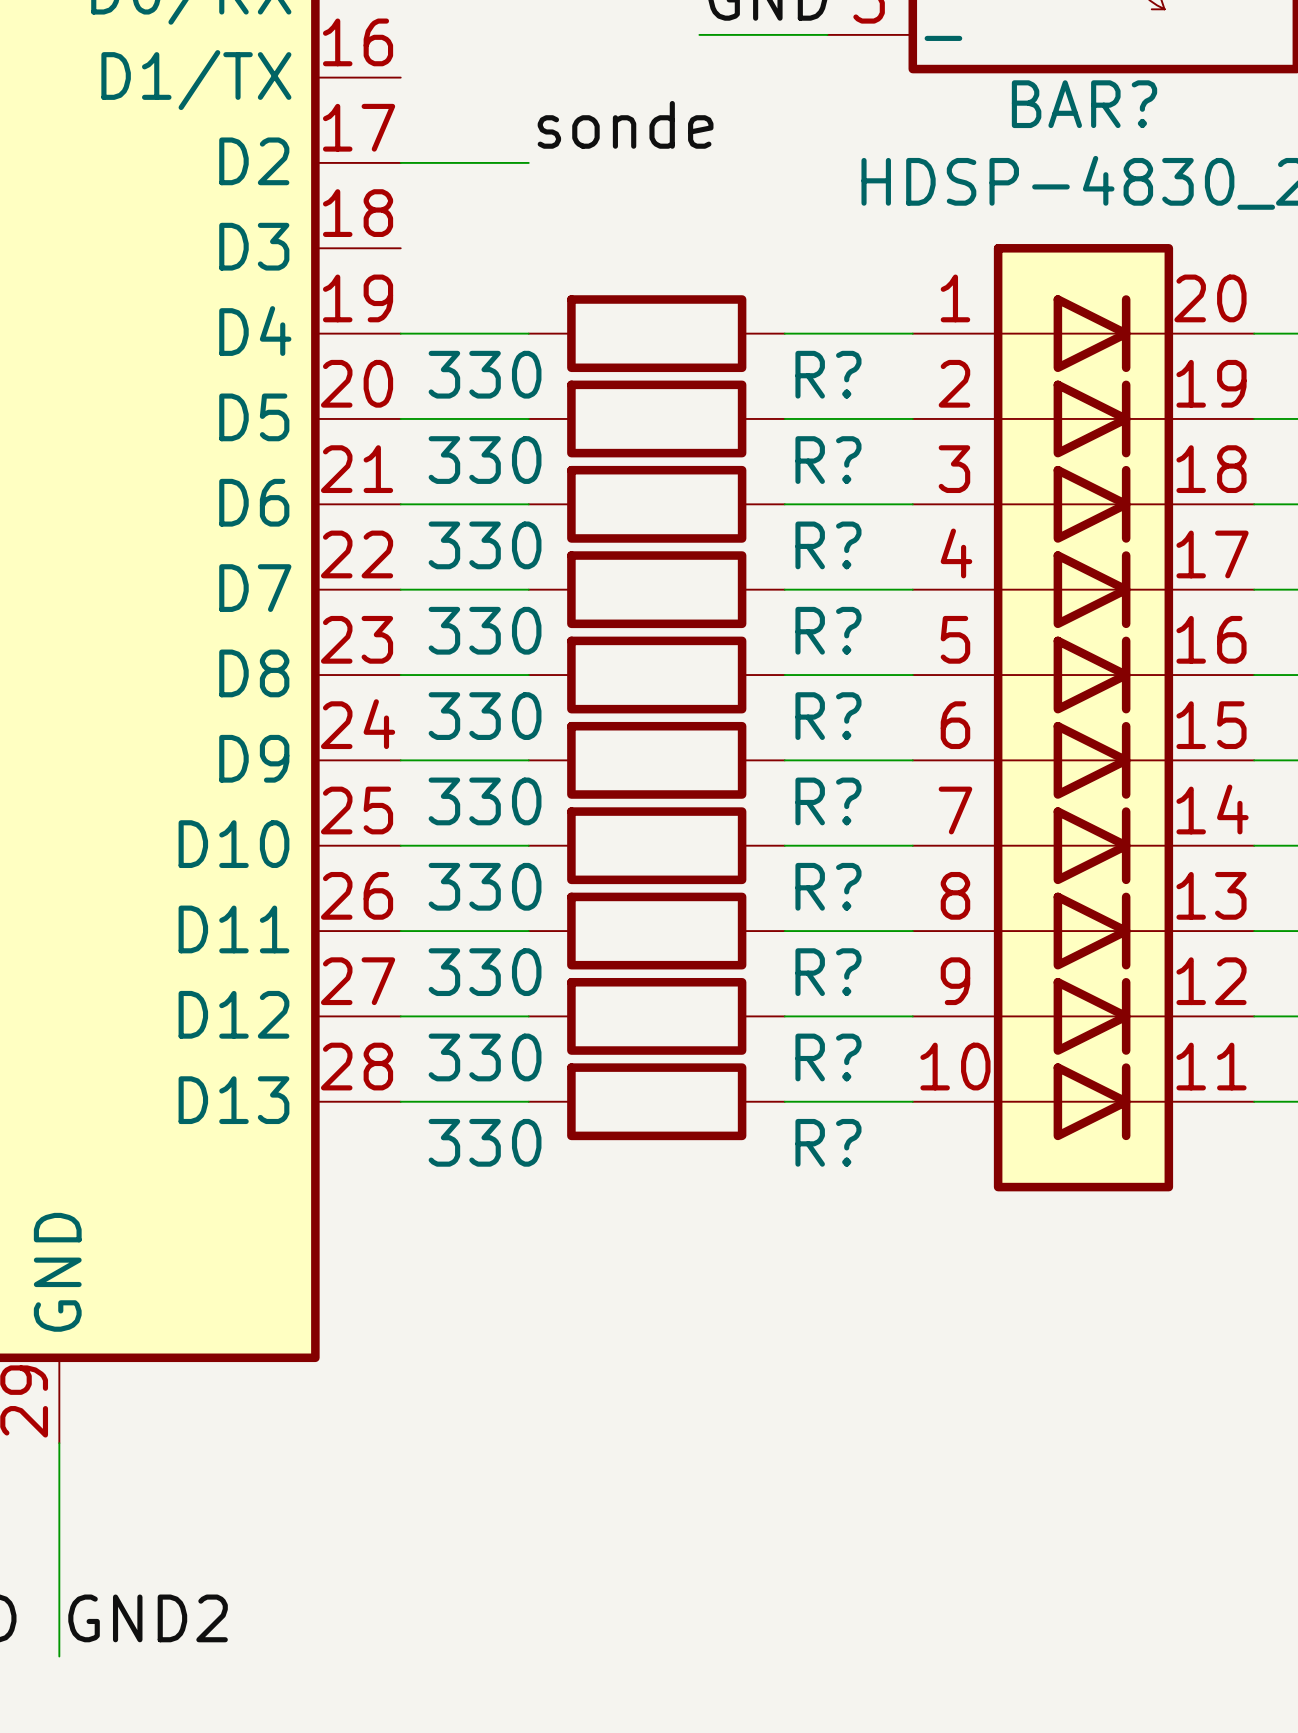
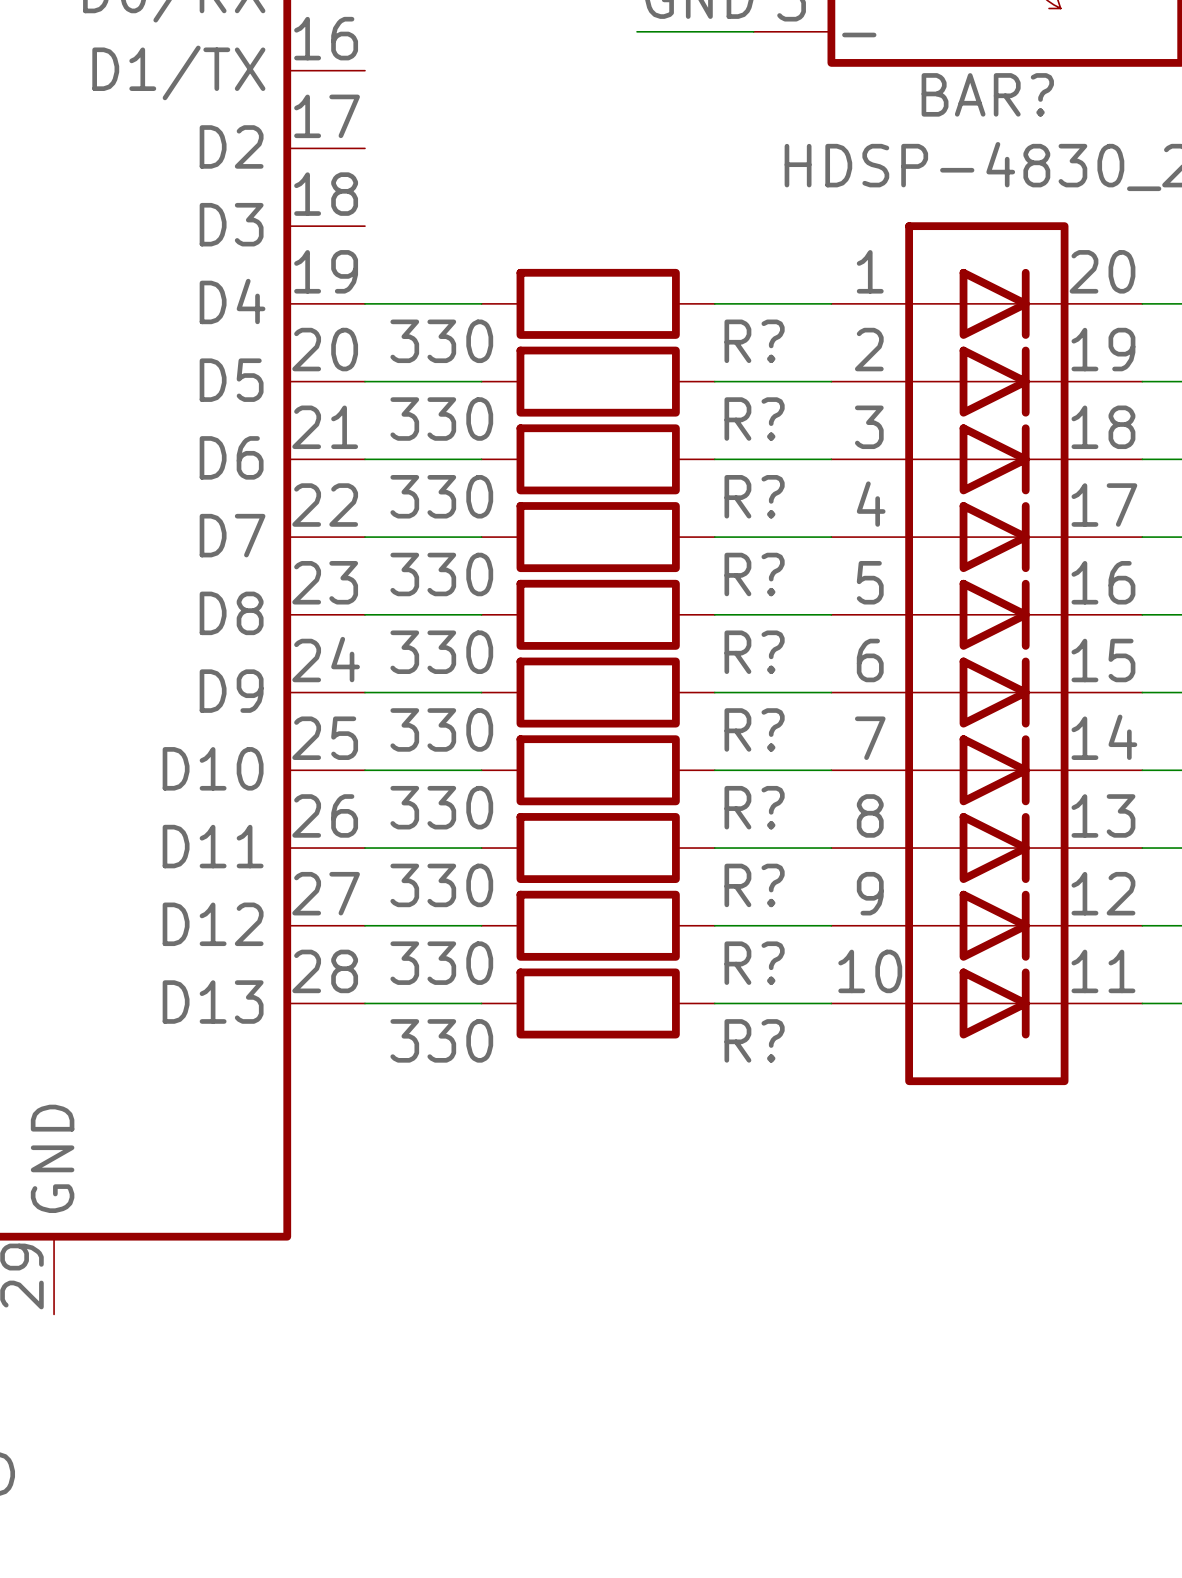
label: sonde (625, 124) -> none
wire: (400, 162) (528, 162) -> none
wire: (59, 1443) (59, 1656) -> none
label: GND2 (148, 1618) -> none

